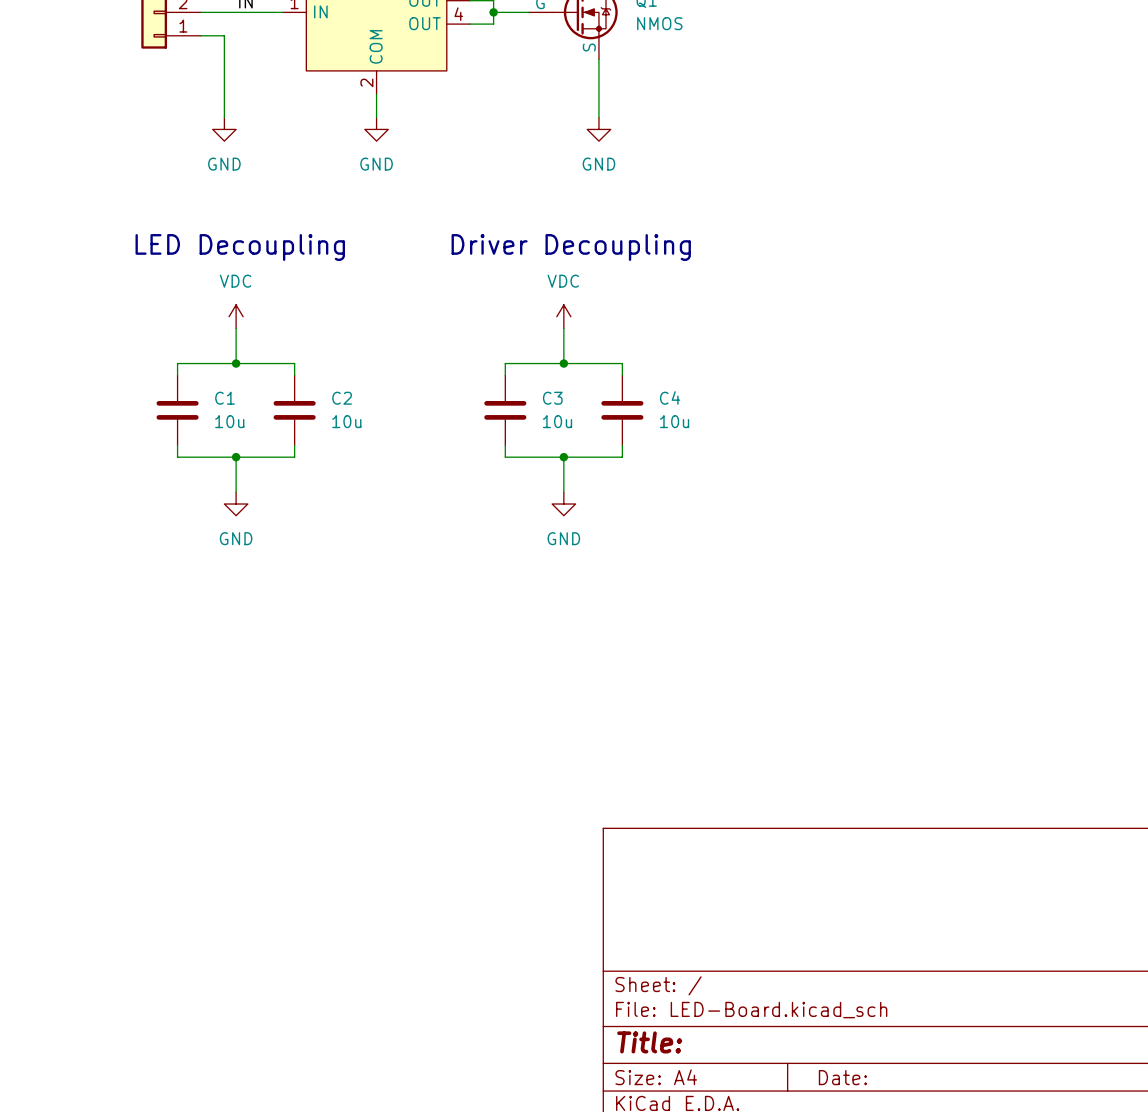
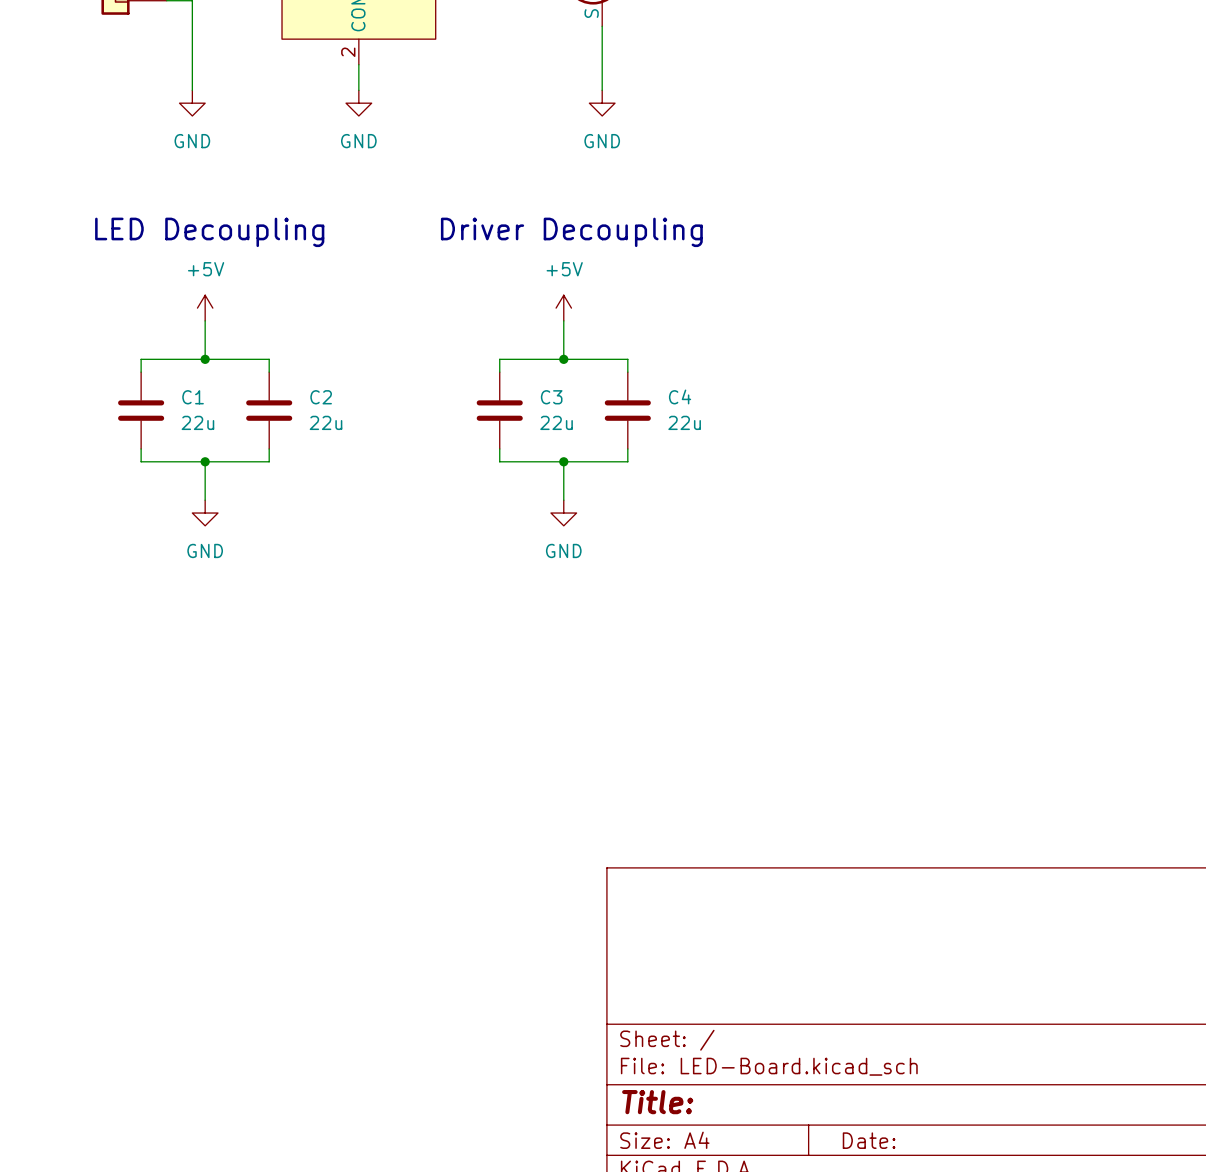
power symbol: VDC (236, 316) -> +5V (205, 308)
power symbol: VDC (563, 316) -> +5V (563, 308)
C1 value: 10u (229, 421) -> 22u (197, 422)
C2 value: 10u (346, 421) -> 22u (326, 422)
C3 value: 10u (557, 421) -> 22u (556, 422)
C4 value: 10u (674, 421) -> 22u (684, 422)

